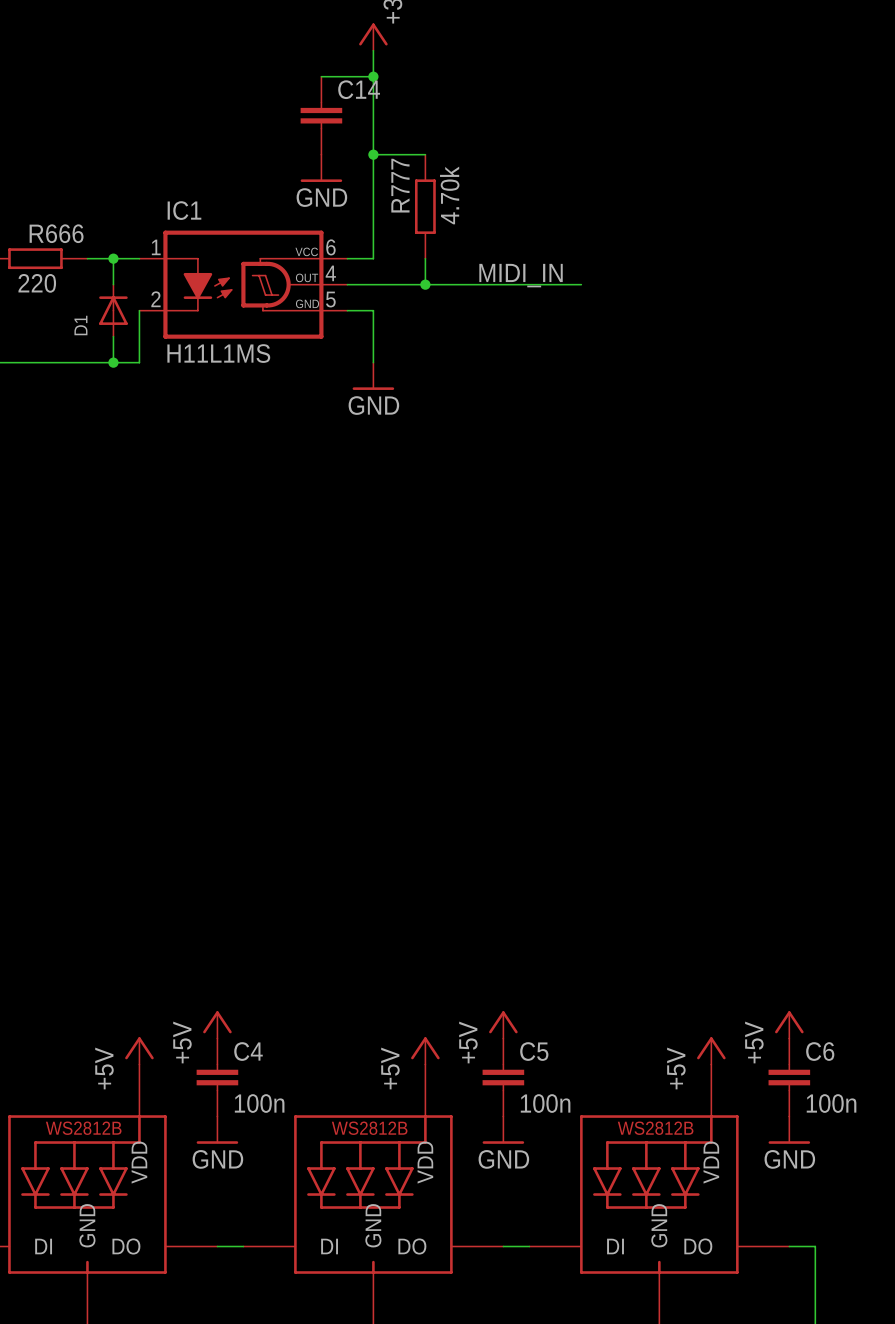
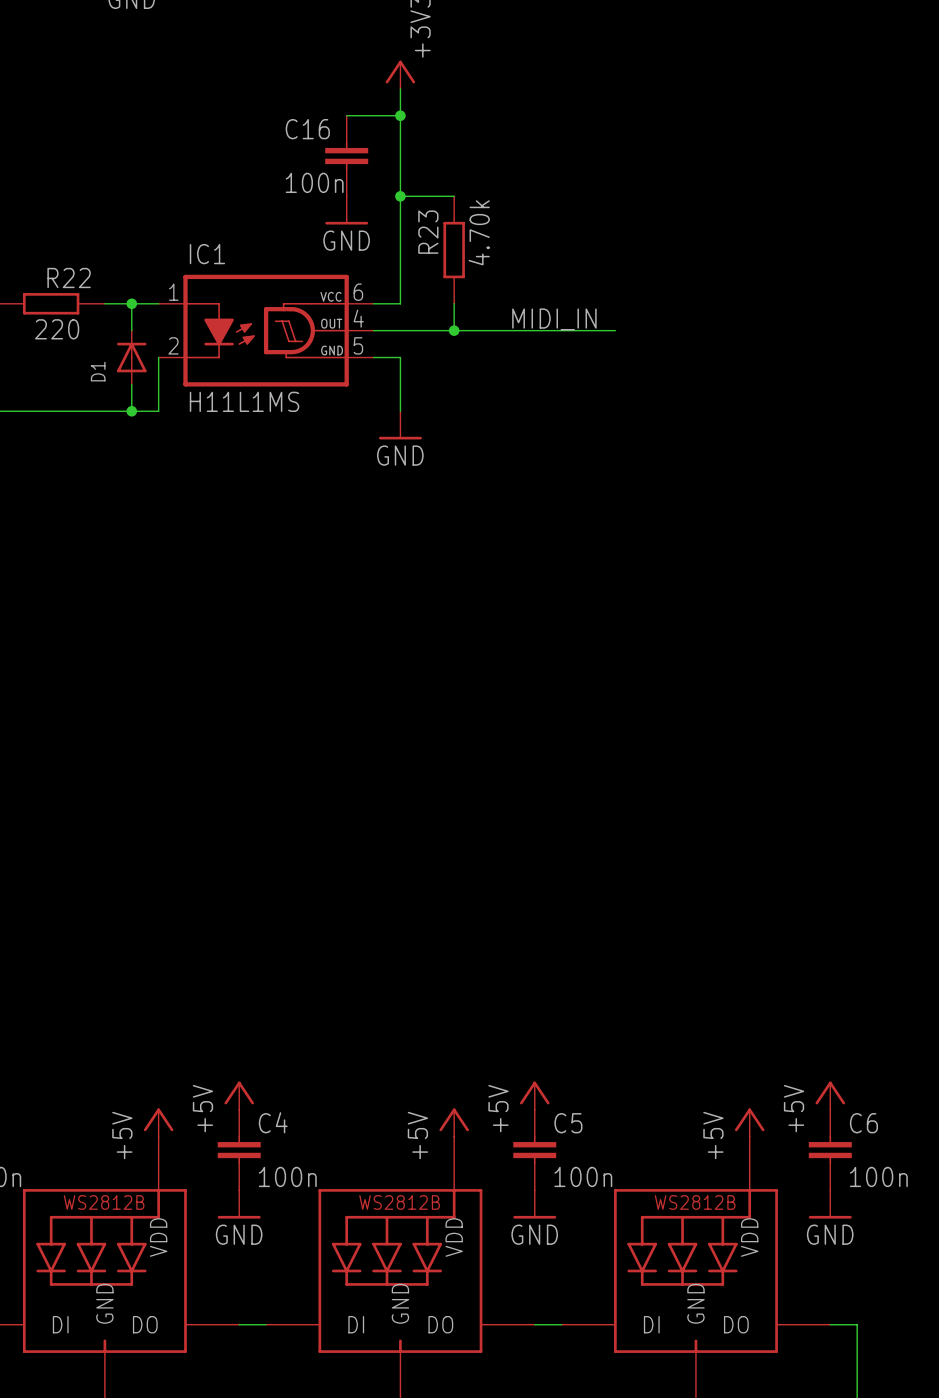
C14 name: C14 (359, 89) -> C16 (307, 129)
C14 value: none -> 100n (314, 182)
R777 name: R777 (400, 185) -> R23 (428, 232)
R666 name: R666 (56, 233) -> R22 (69, 278)

